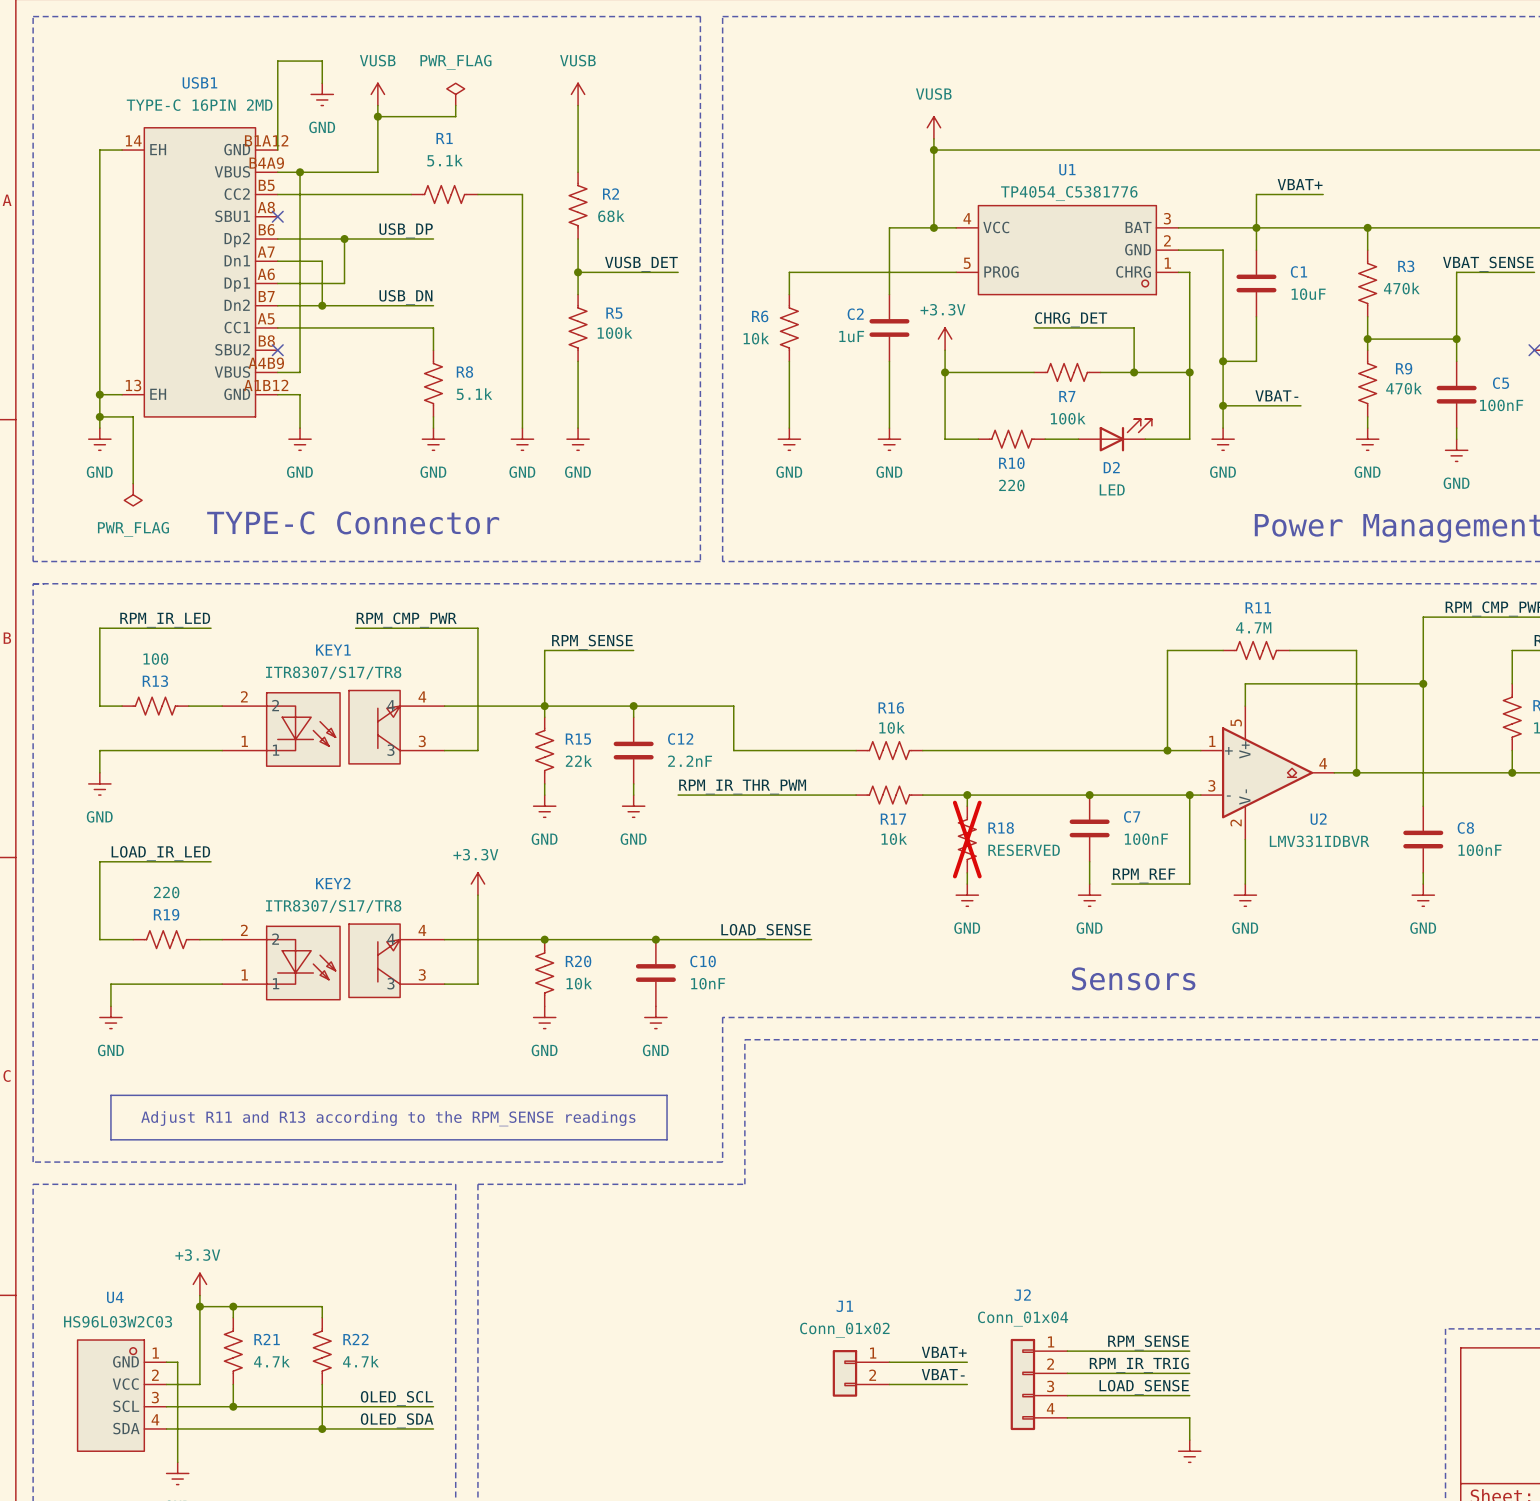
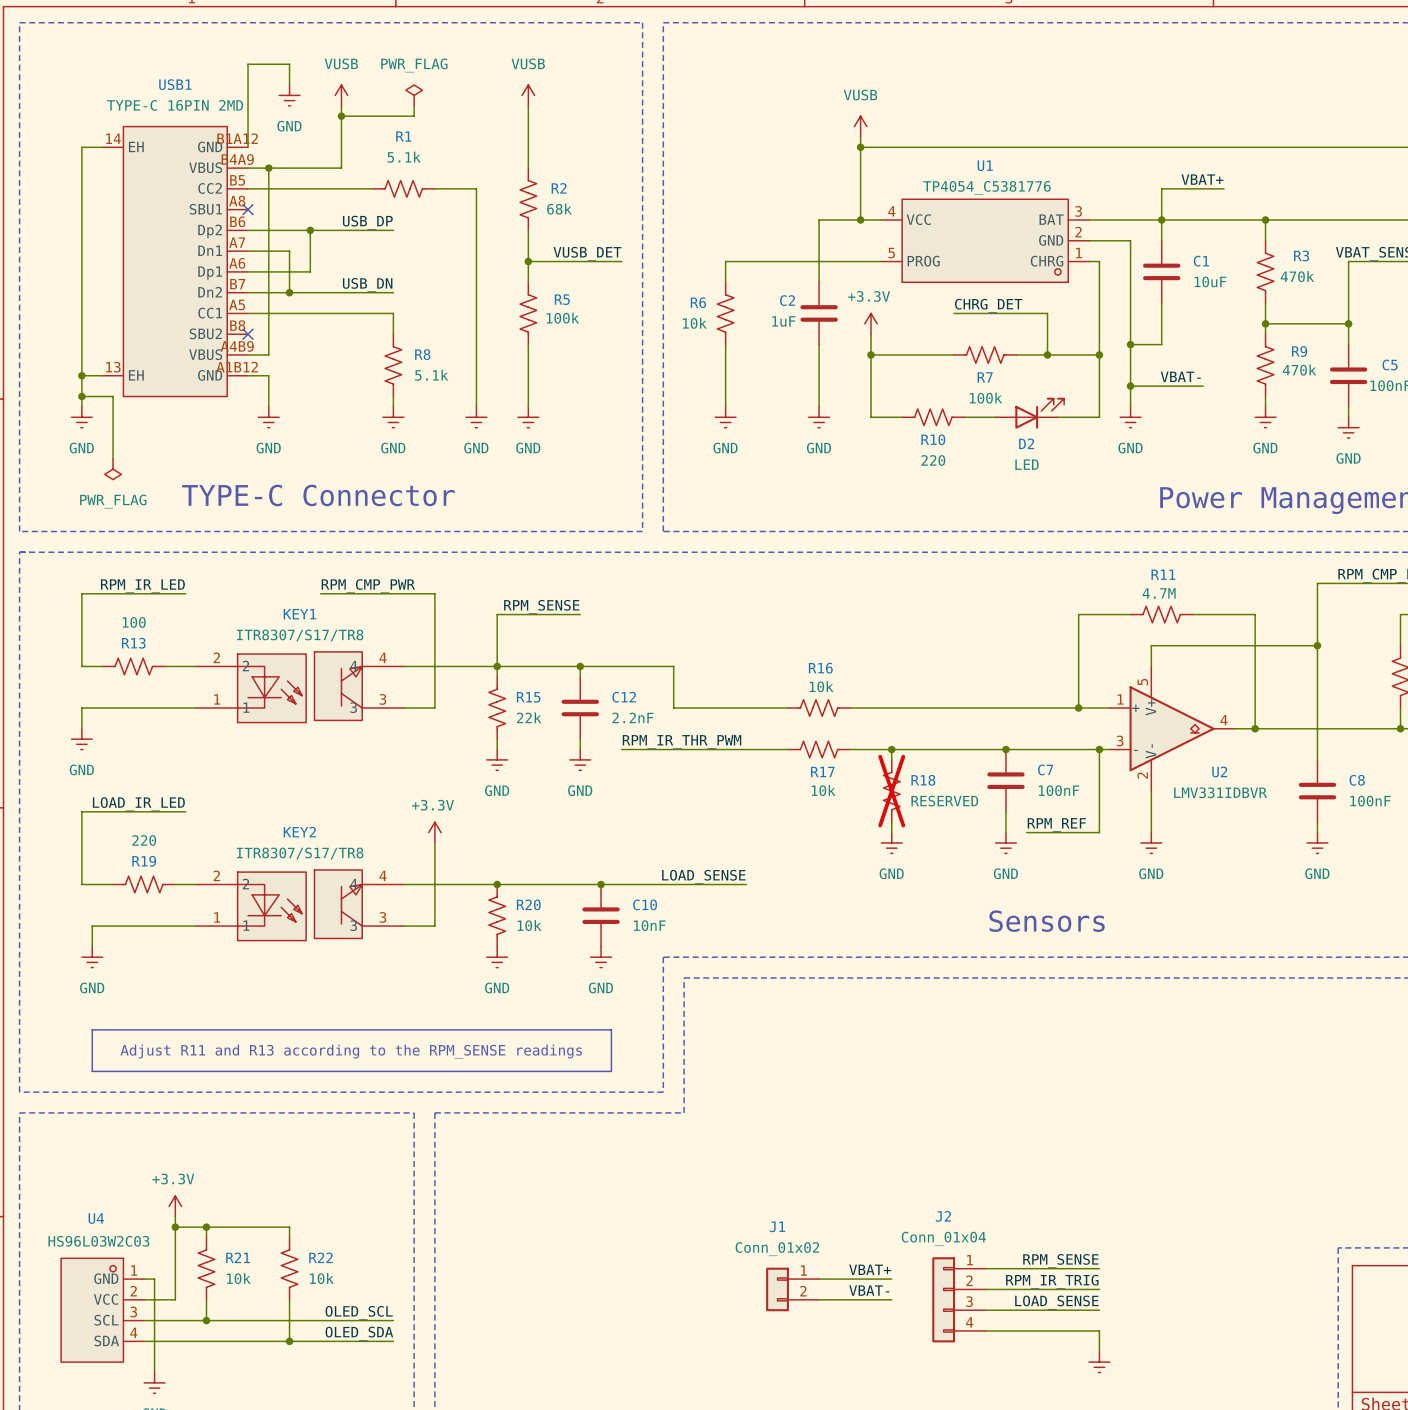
R21 value: 4.7k (271, 1361) -> 10k (238, 1278)
R22 value: 4.7k (360, 1361) -> 10k (321, 1278)

